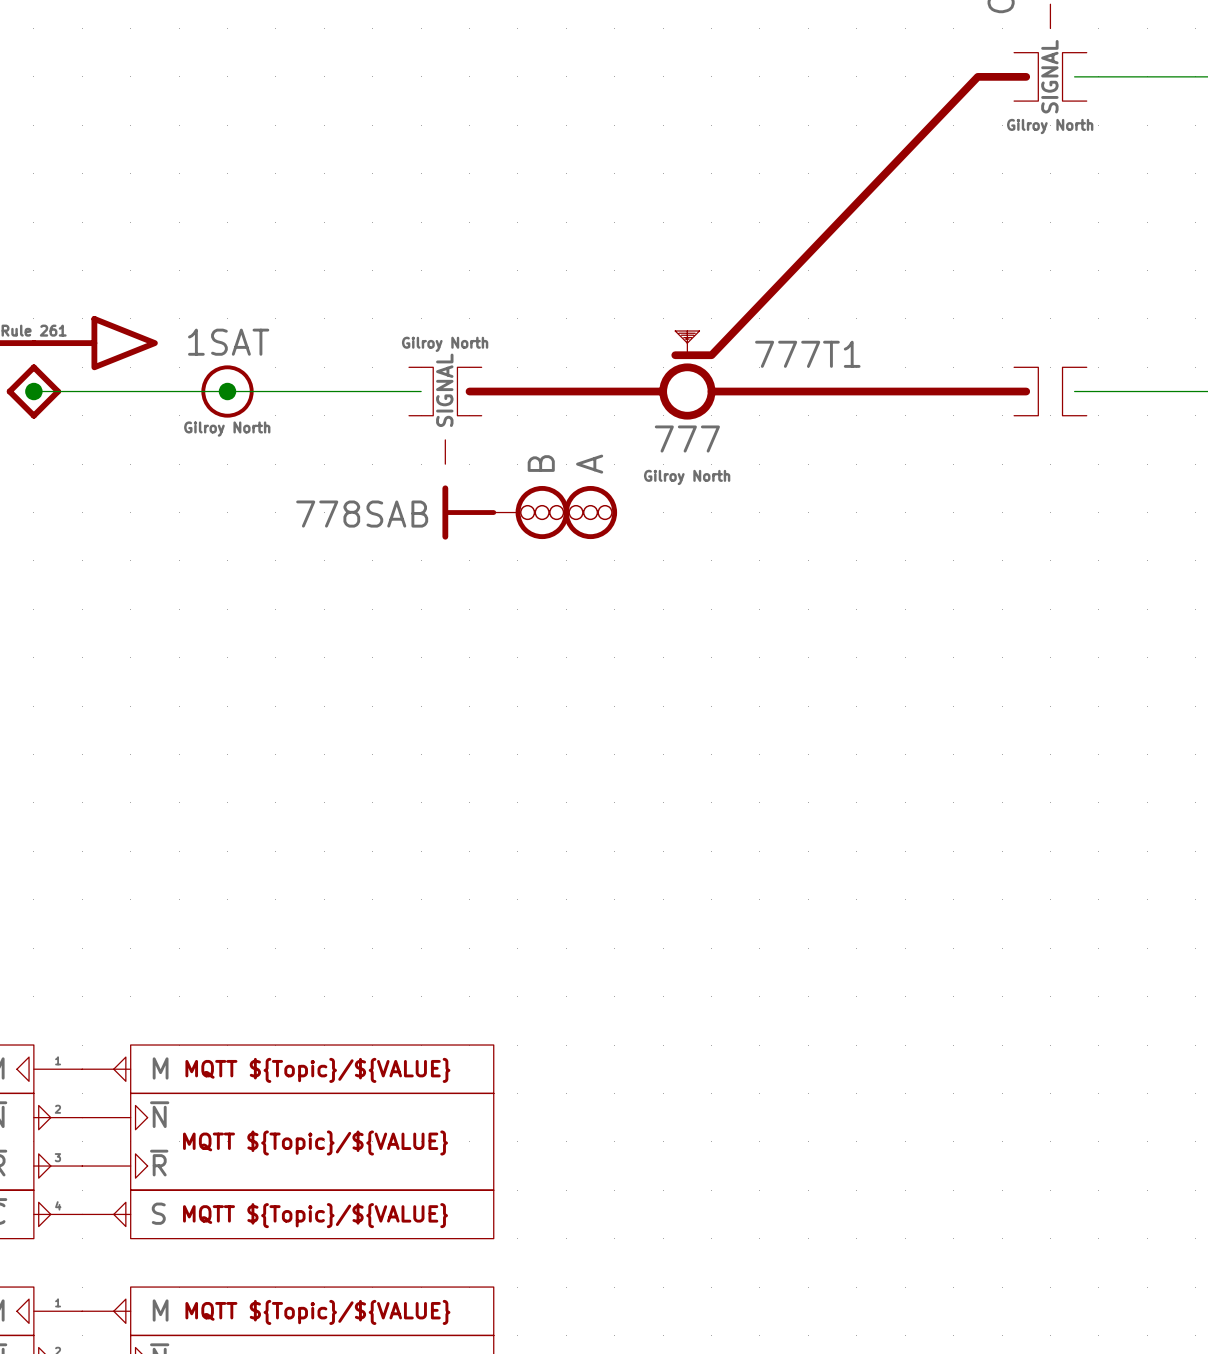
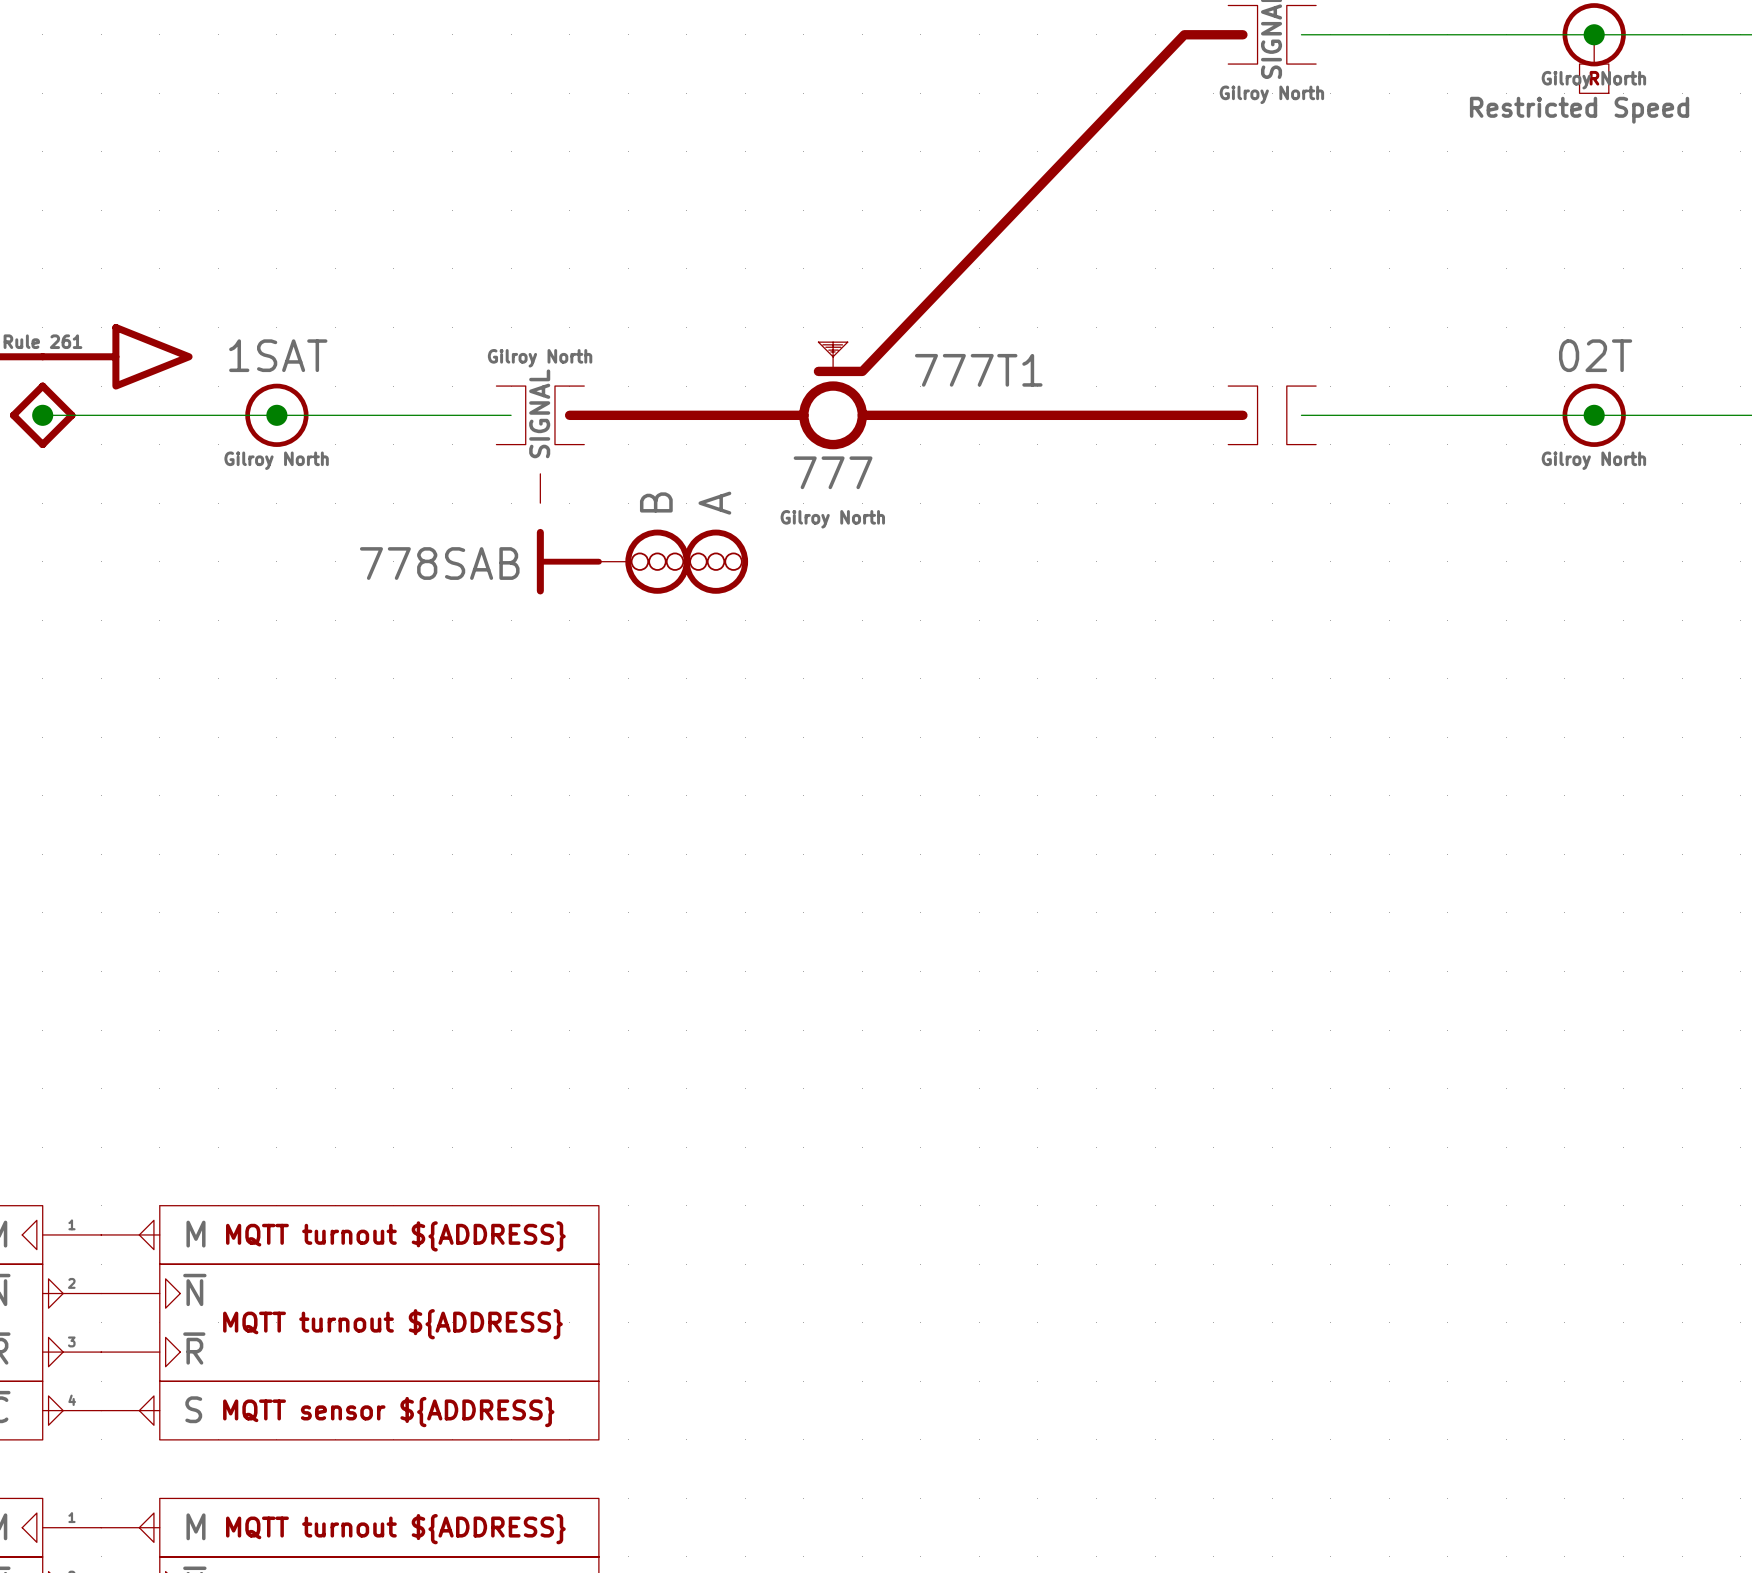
part text: MQTT ${Topic}/${VALUE} (317, 1070) -> MQTT turnout ${ADDRESS} (395, 1236)
part text: MQTT ${Topic}/${VALUE} (315, 1143) -> MQTT turnout ${ADDRESS} (392, 1324)
part text: MQTT ${Topic}/${VALUE} (315, 1215) -> MQTT sensor ${ADDRESS} (388, 1412)
part text: MQTT ${Topic}/${VALUE} (317, 1312) -> MQTT turnout ${ADDRESS} (395, 1529)

